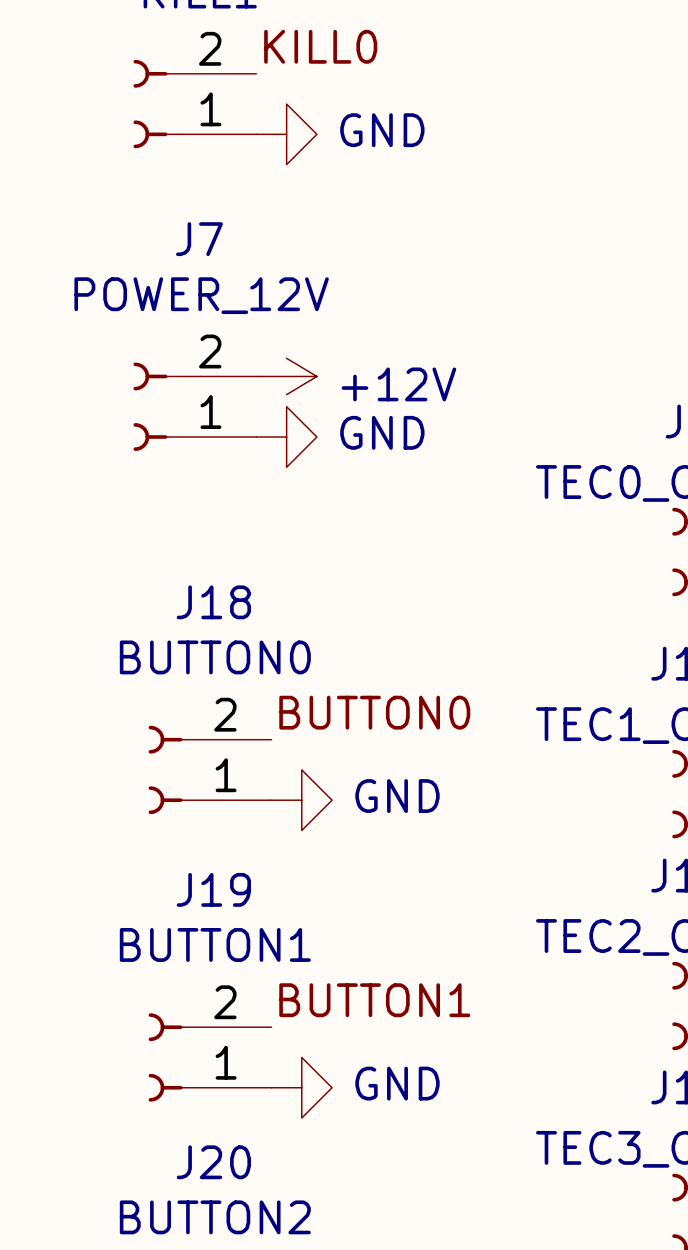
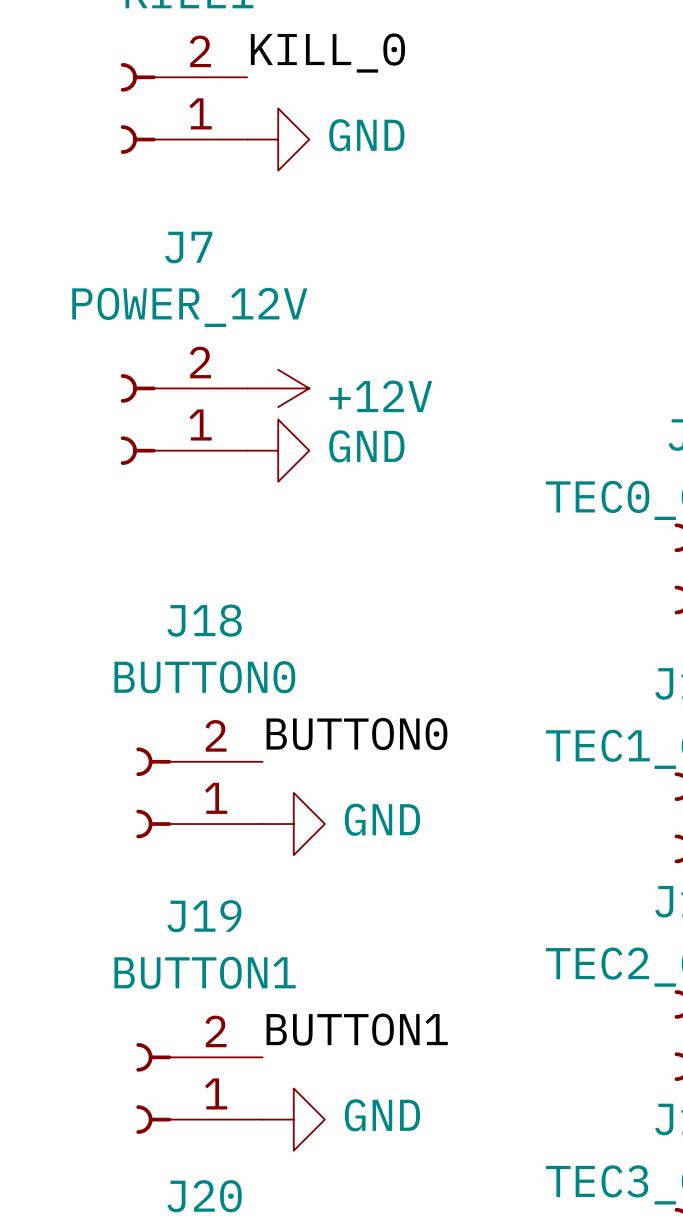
label: KILL0 (320, 46) -> KILL_0 (327, 53)

